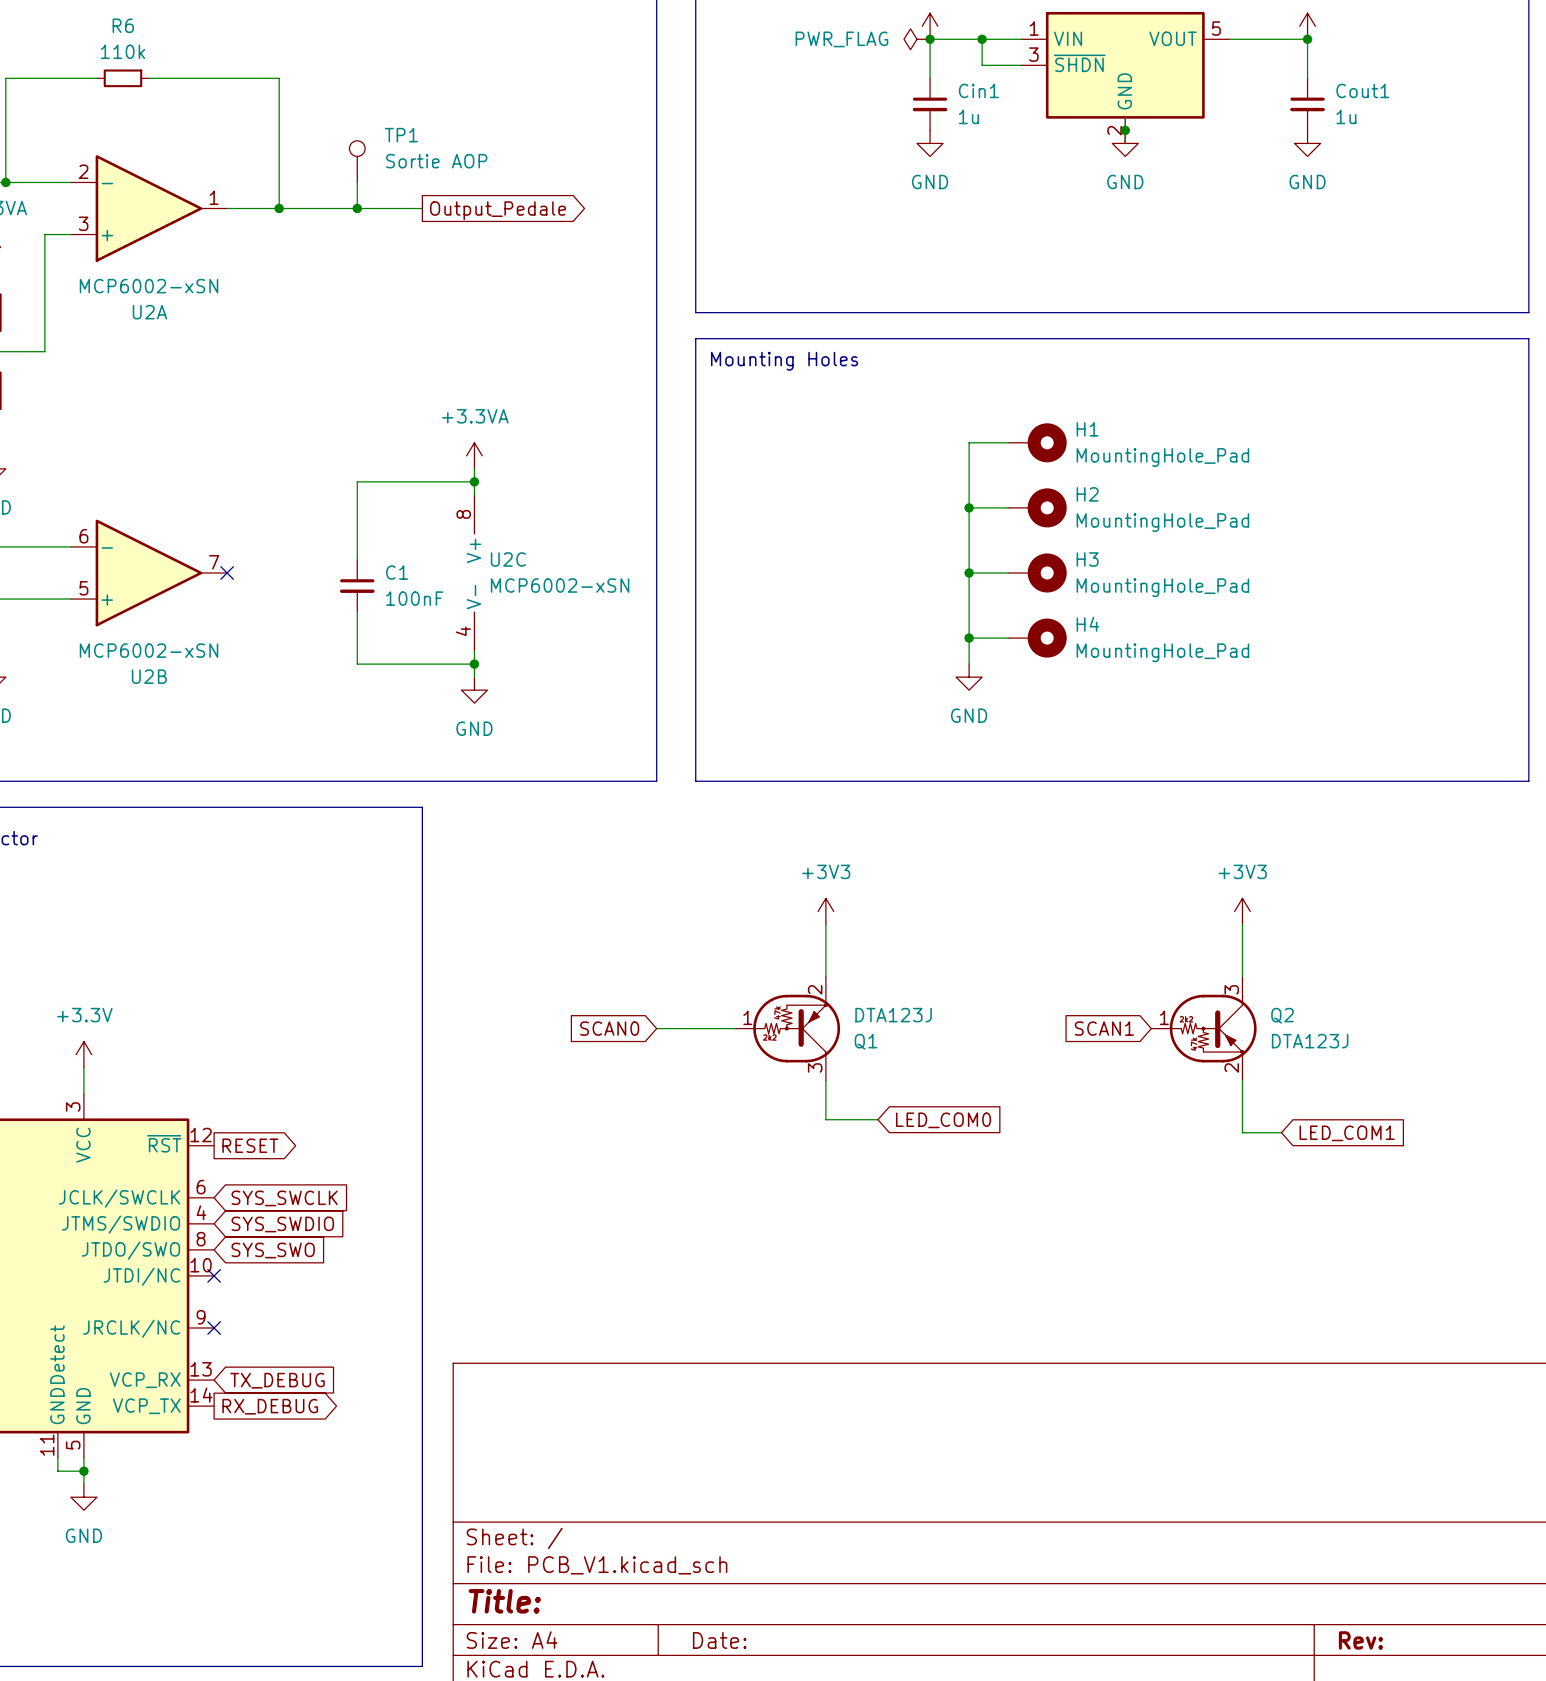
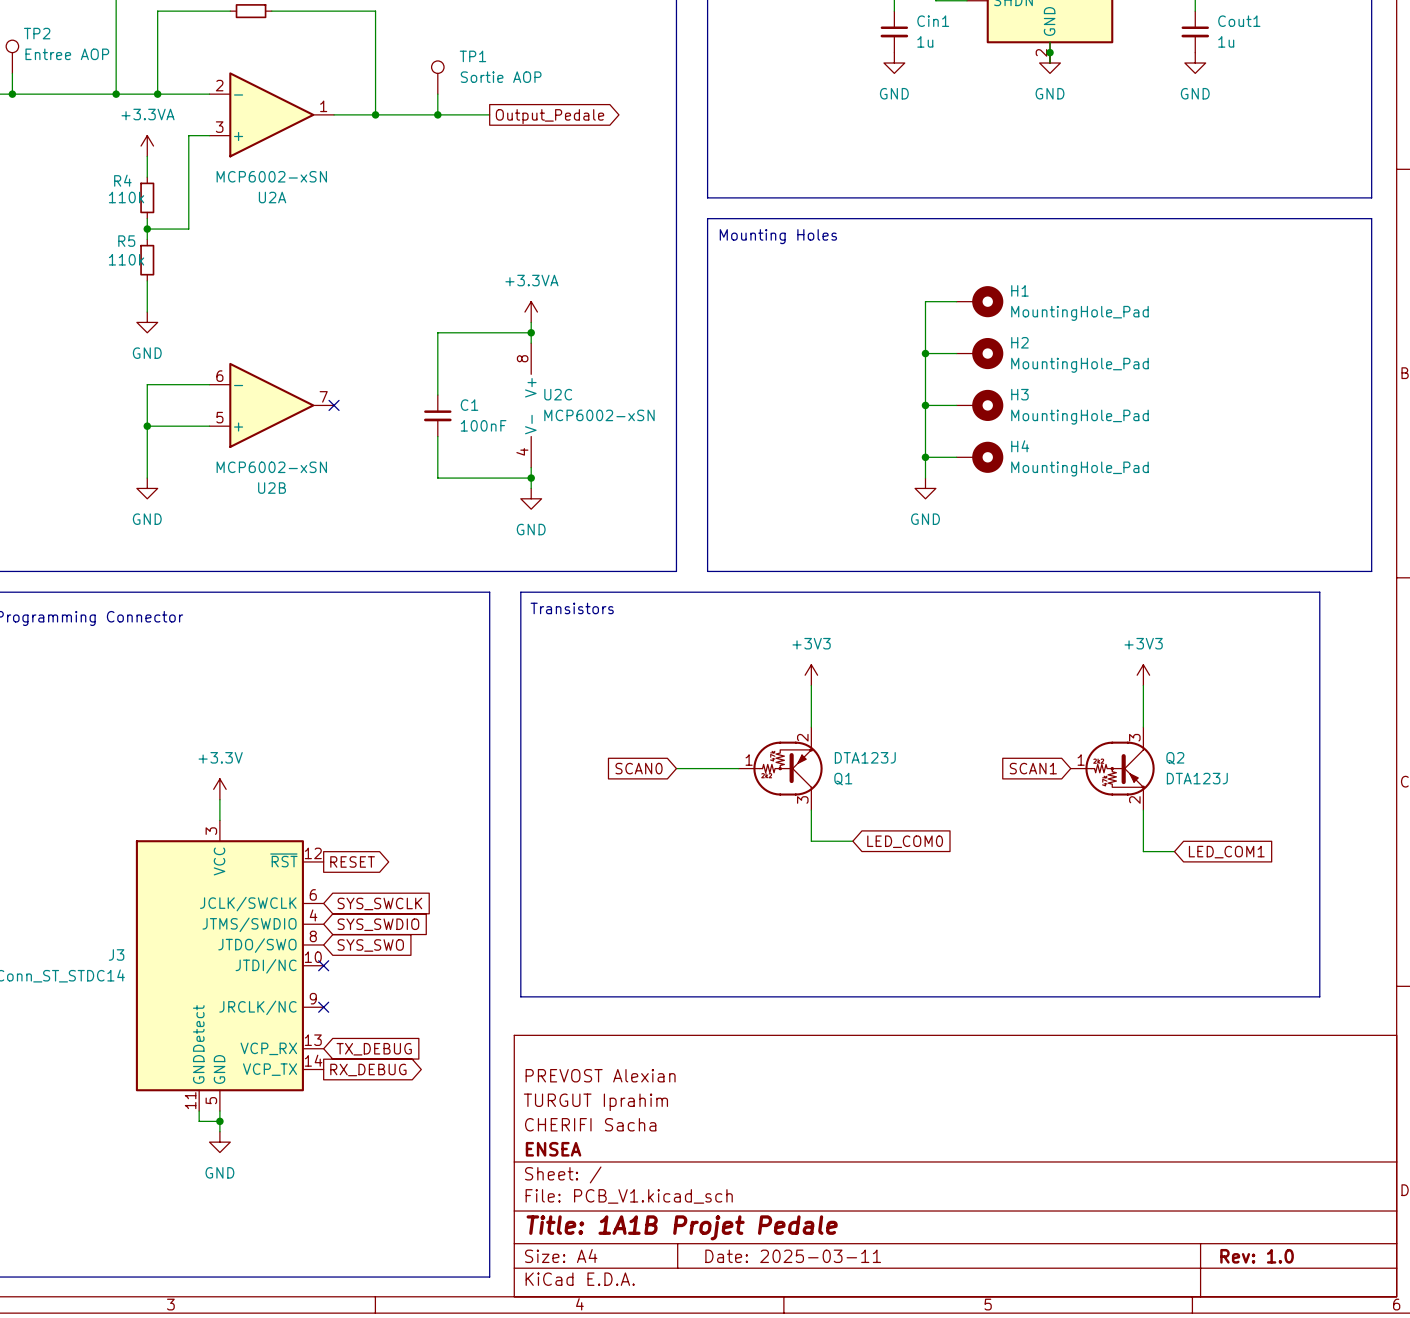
line: none -> (520, 592) (1319, 592) (1319, 996) (520, 996) (520, 592)
text: none -> Transistors (572, 608)
title block: none -> PREVOST Alexian (600, 1075)
title block: none -> TURGUT Iprahim (595, 1102)
title block: none -> CHERIFI Sacha (590, 1124)
title block: none -> ENSEA (553, 1149)
title block: Title: (504, 1601) -> Title: 1A1B Projet Pedale (682, 1227)
title block: Date: (719, 1640) -> Date: 2025-03-11 (793, 1256)
title block: Rev: (1360, 1640) -> Rev: 1.0 (1257, 1256)

